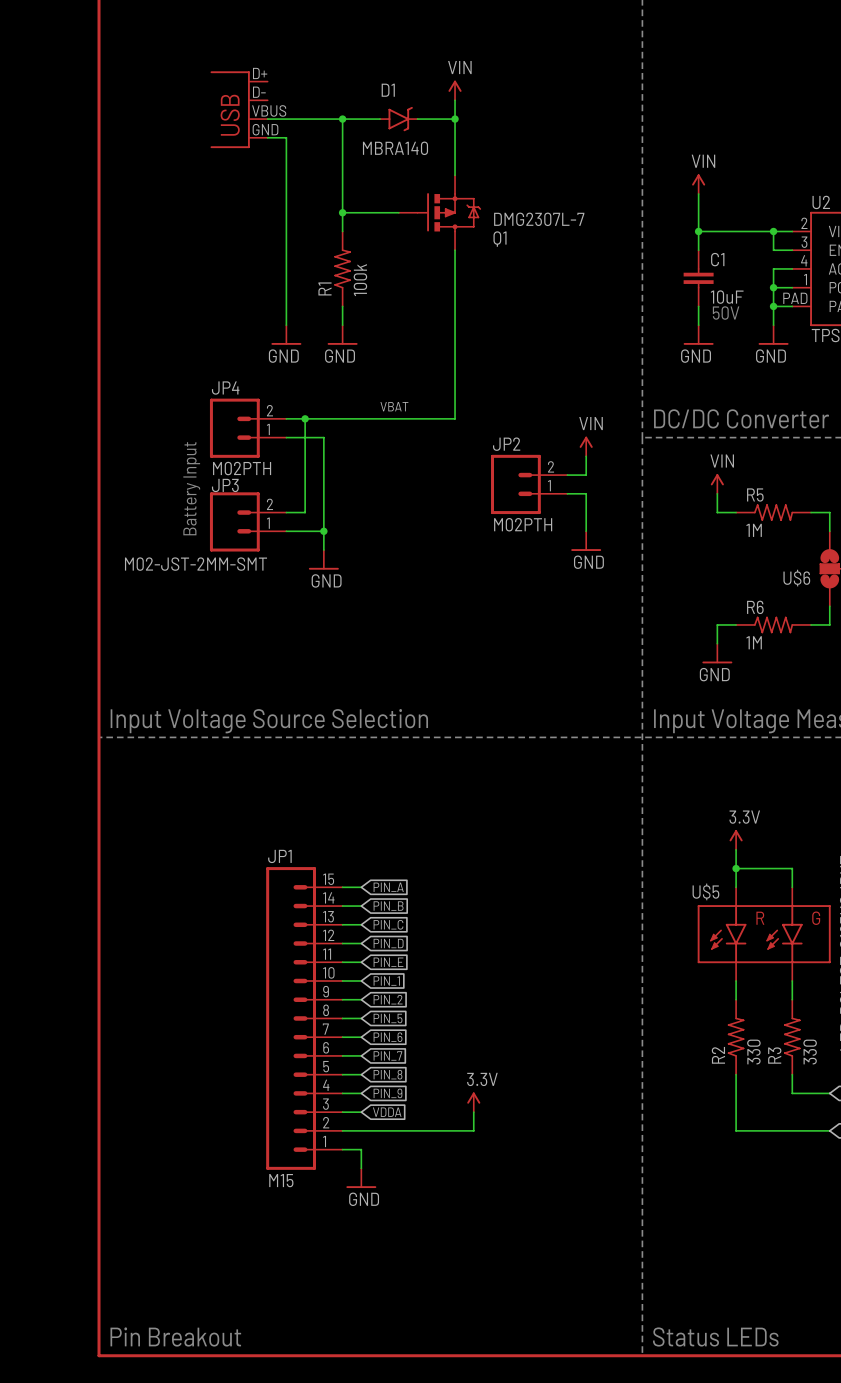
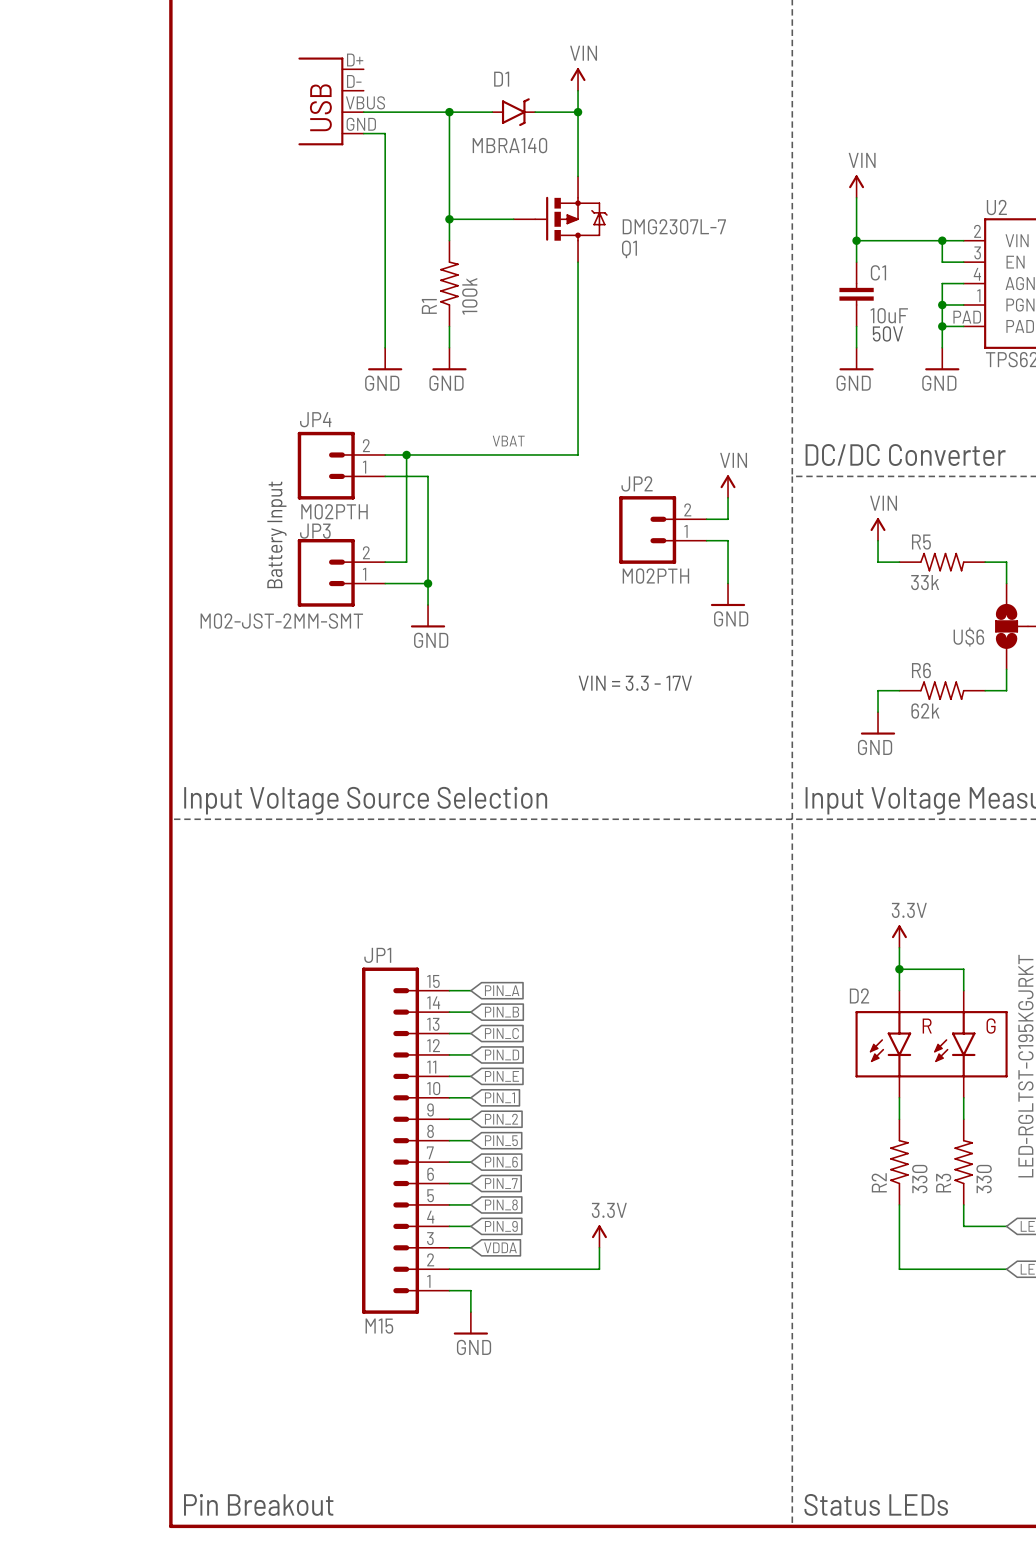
R5 value: 1M (754, 530) -> 33k (925, 582)
text: none -> VIN = 3.3 - 17V (635, 683)
R6 value: 1M (754, 642) -> 62k (925, 711)
U$5 name: U$5 (705, 891) -> D2 (859, 995)

